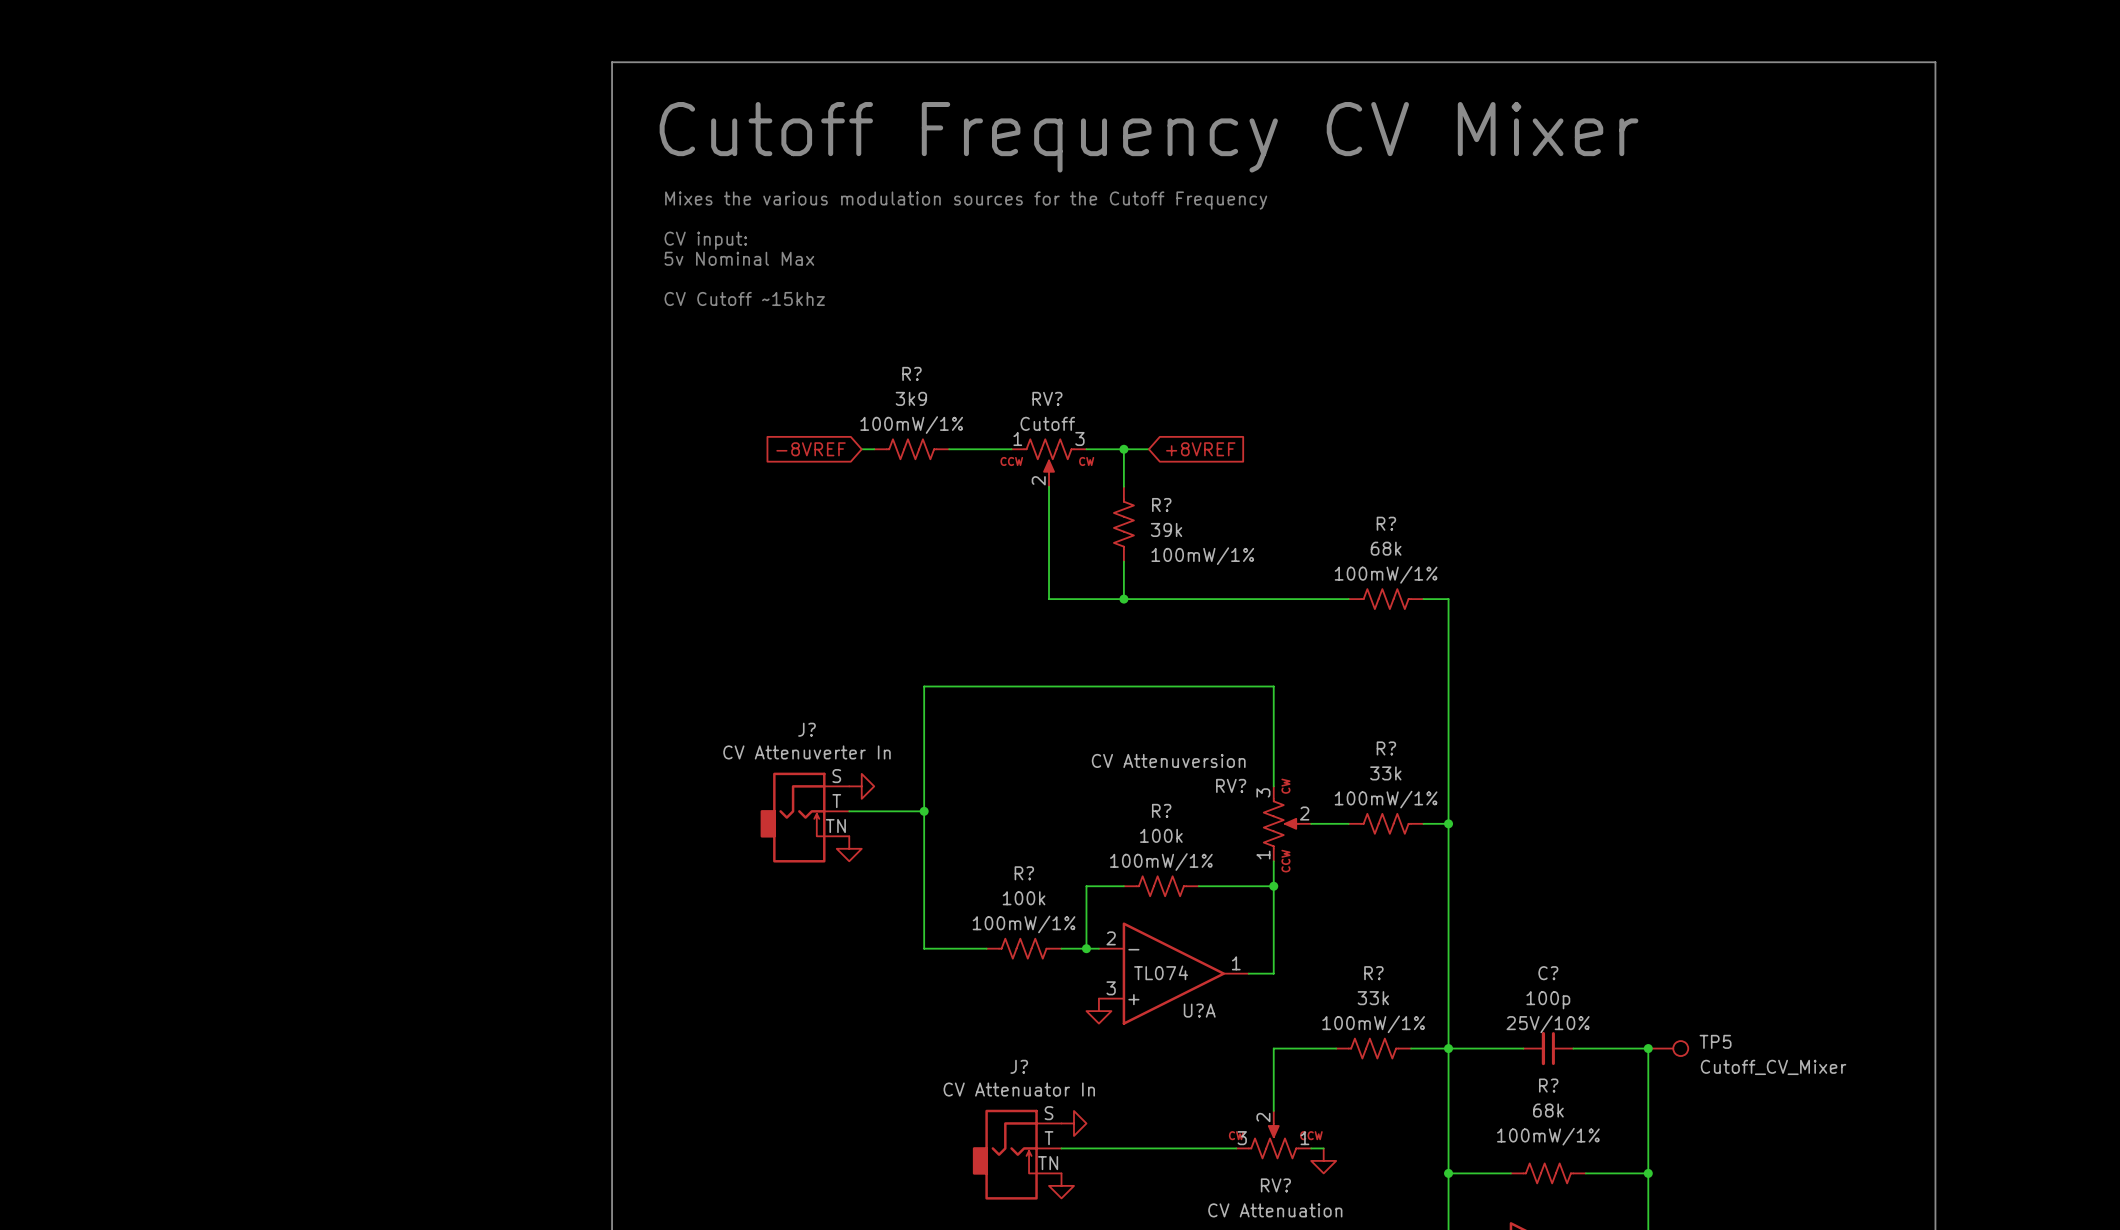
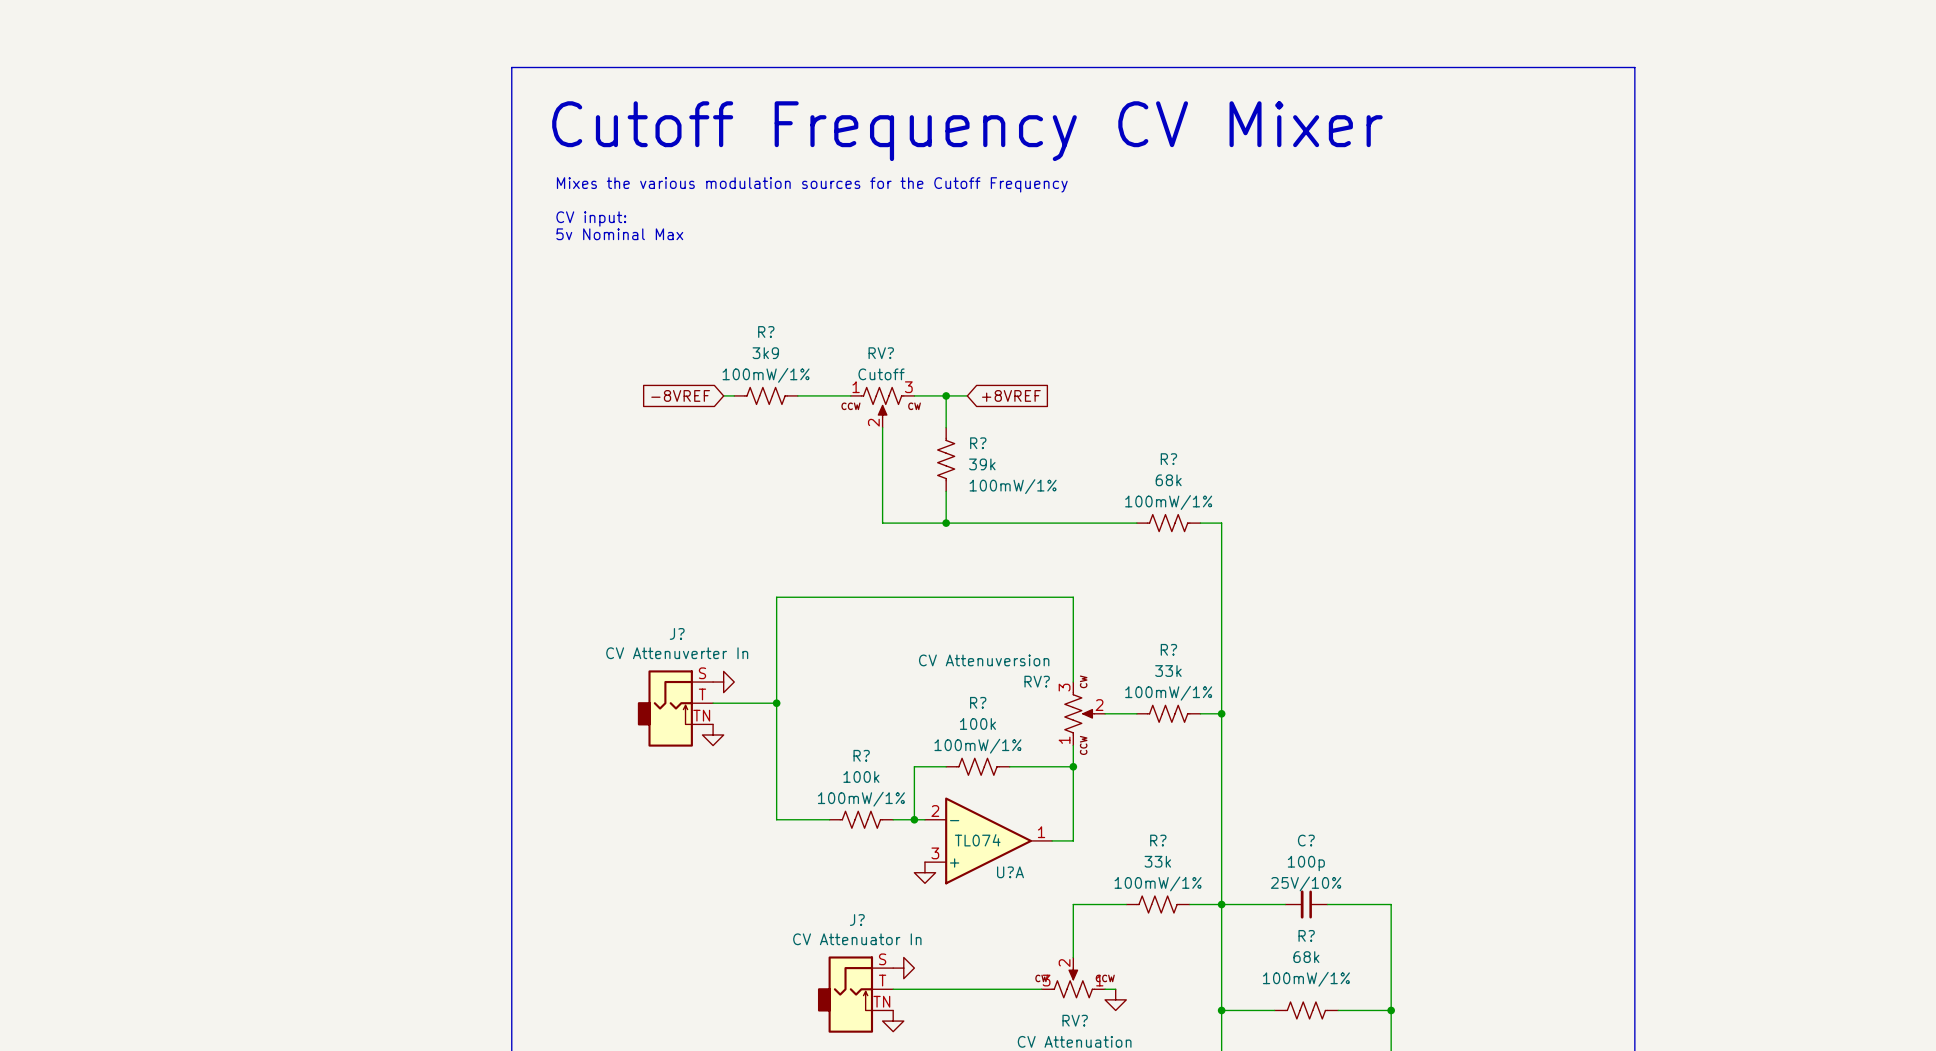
text: CV Cutoff ~15khz (744, 298) -> none
junction: (1648, 1048) -> none
TP5: Cutoff_CV_Mixer (1668, 1048) -> none

